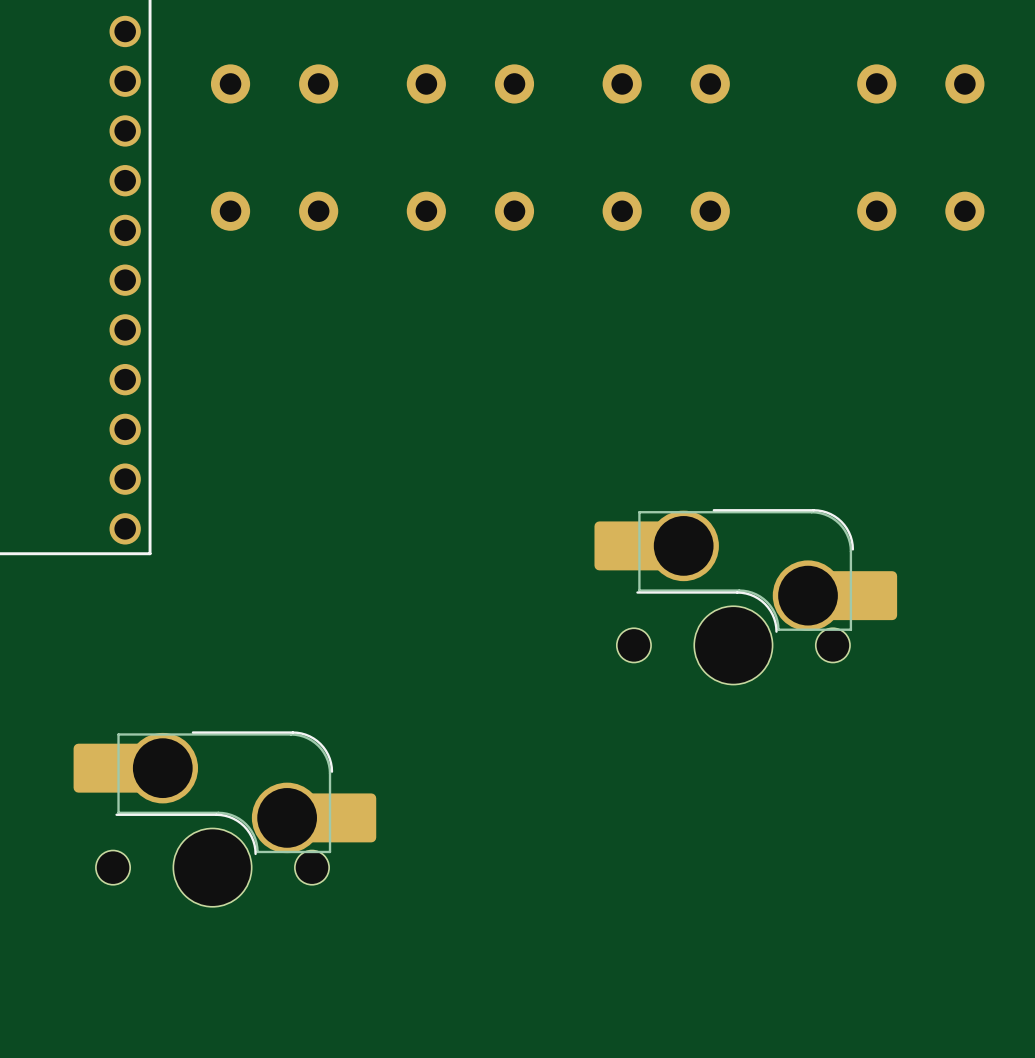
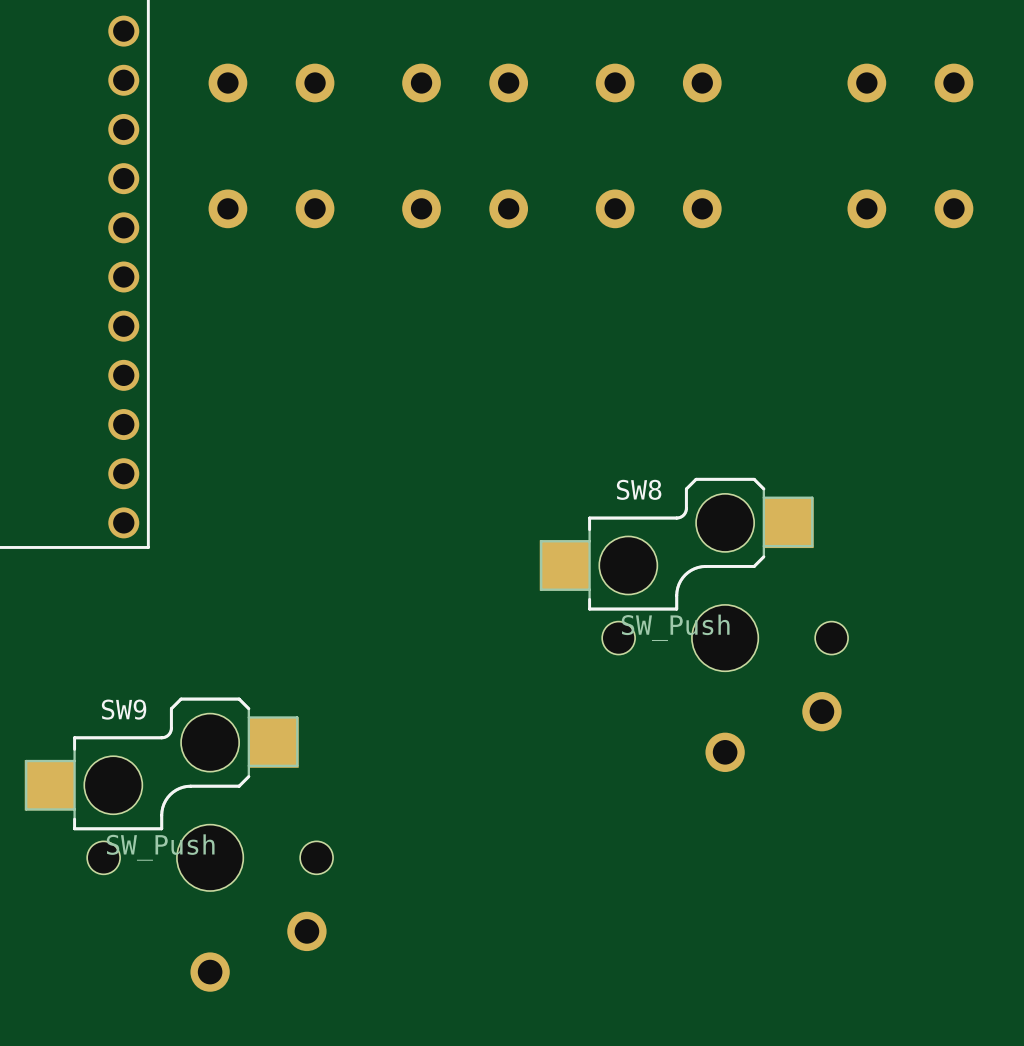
part: (745, 596) -> none
SW8: none -> SW_Push (693, 624)
part: (224, 819) -> none
SW9: none -> SW_Push (178, 844)

